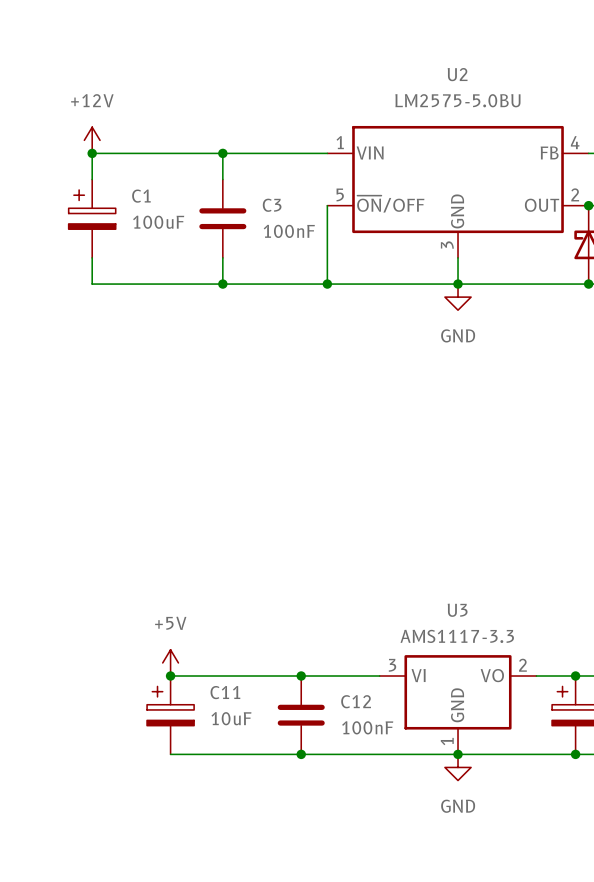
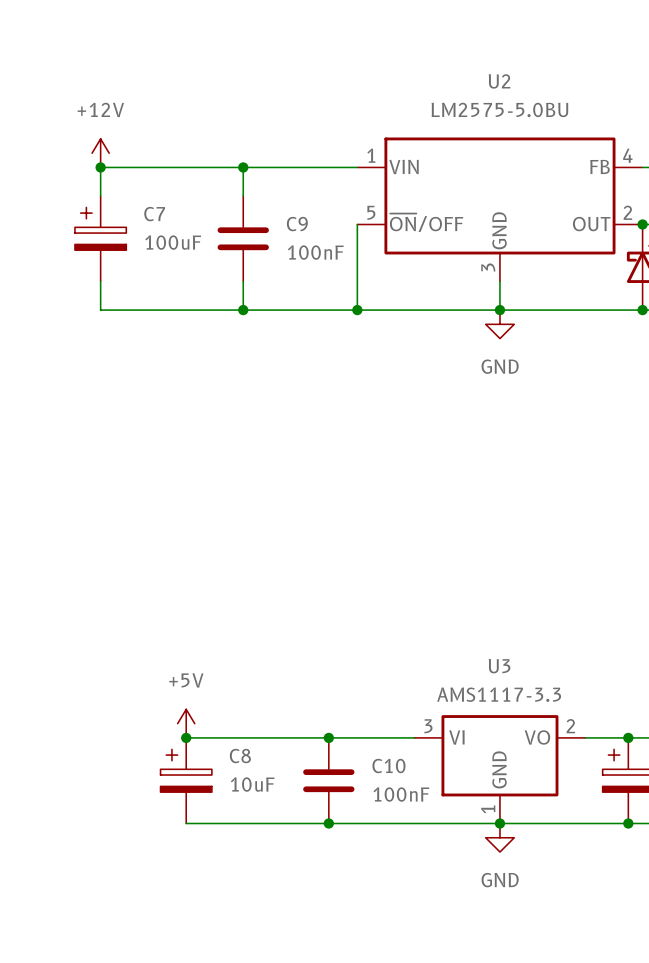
C1 name: C1 (141, 196) -> C7 (154, 214)
C3 name: C3 (272, 205) -> C9 (297, 224)
C11 name: C11 (225, 692) -> C8 (240, 756)
C12 name: C12 (356, 701) -> C10 (388, 766)

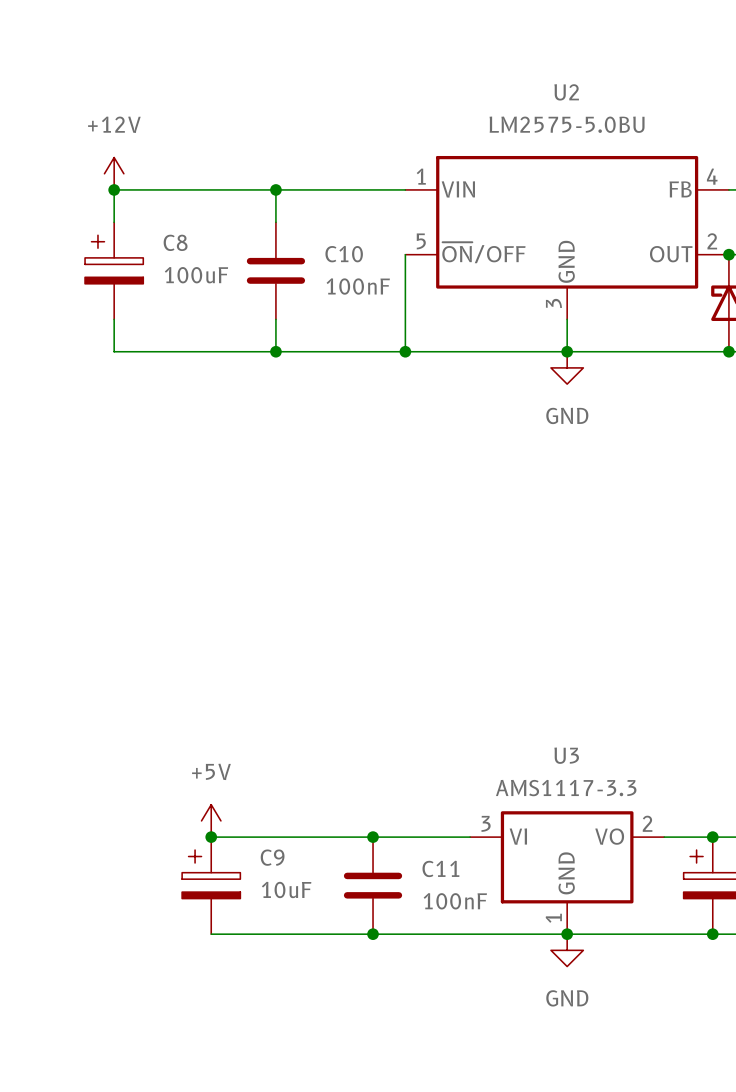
C7 name: C7 (154, 214) -> C8 (175, 242)
C9 name: C9 (297, 224) -> C10 (344, 254)
C8 name: C8 (240, 756) -> C9 (272, 857)
C10 name: C10 (388, 766) -> C11 (440, 868)

